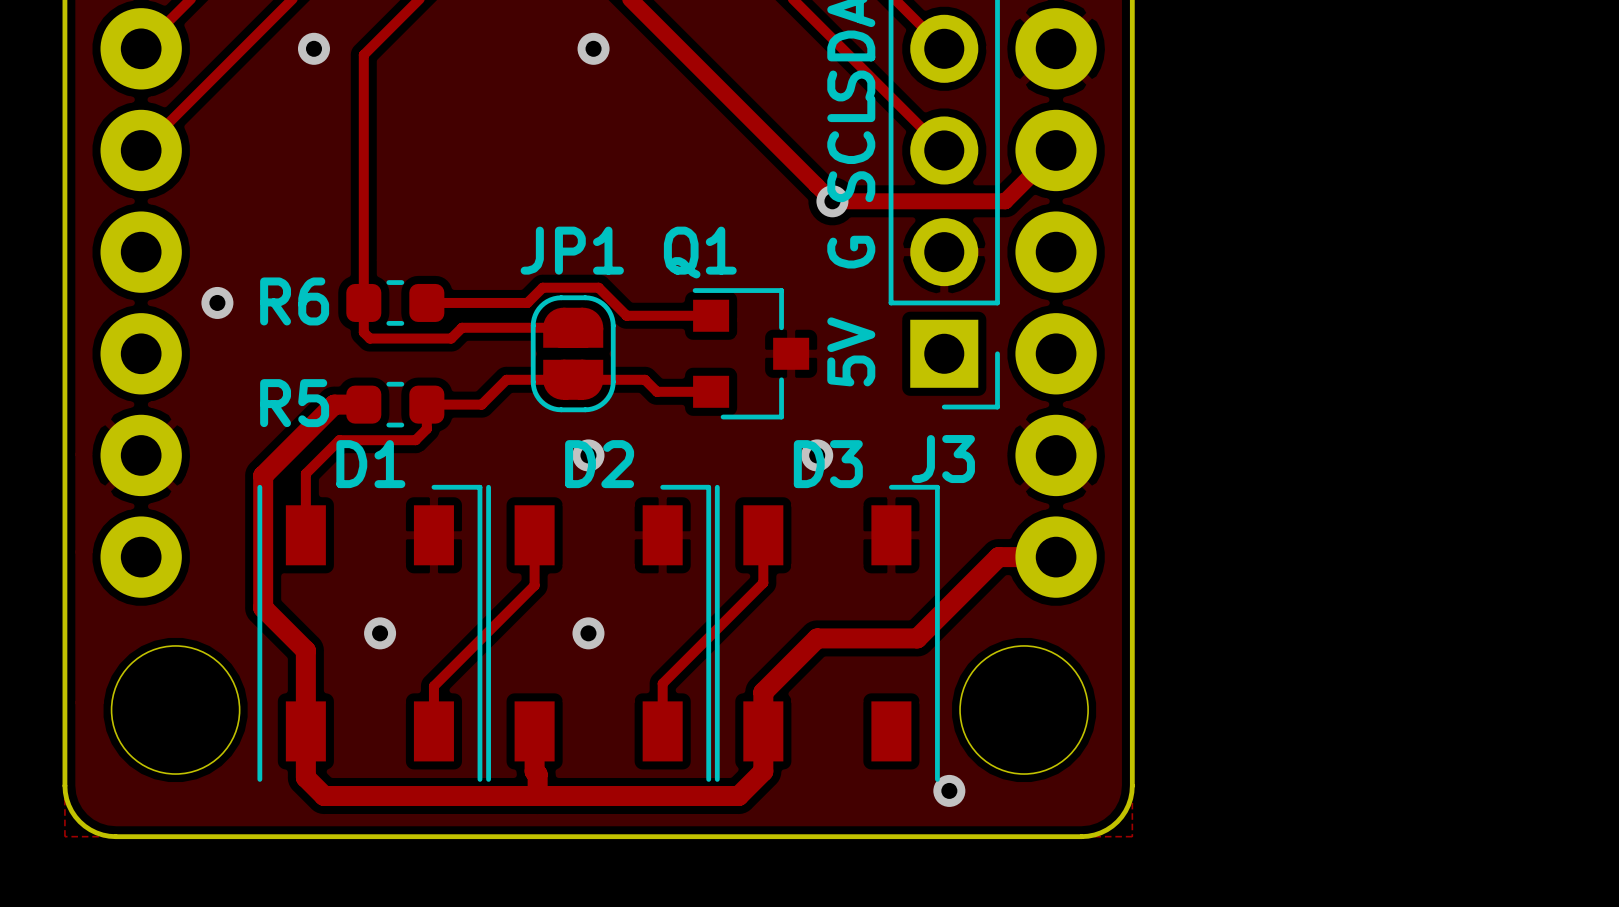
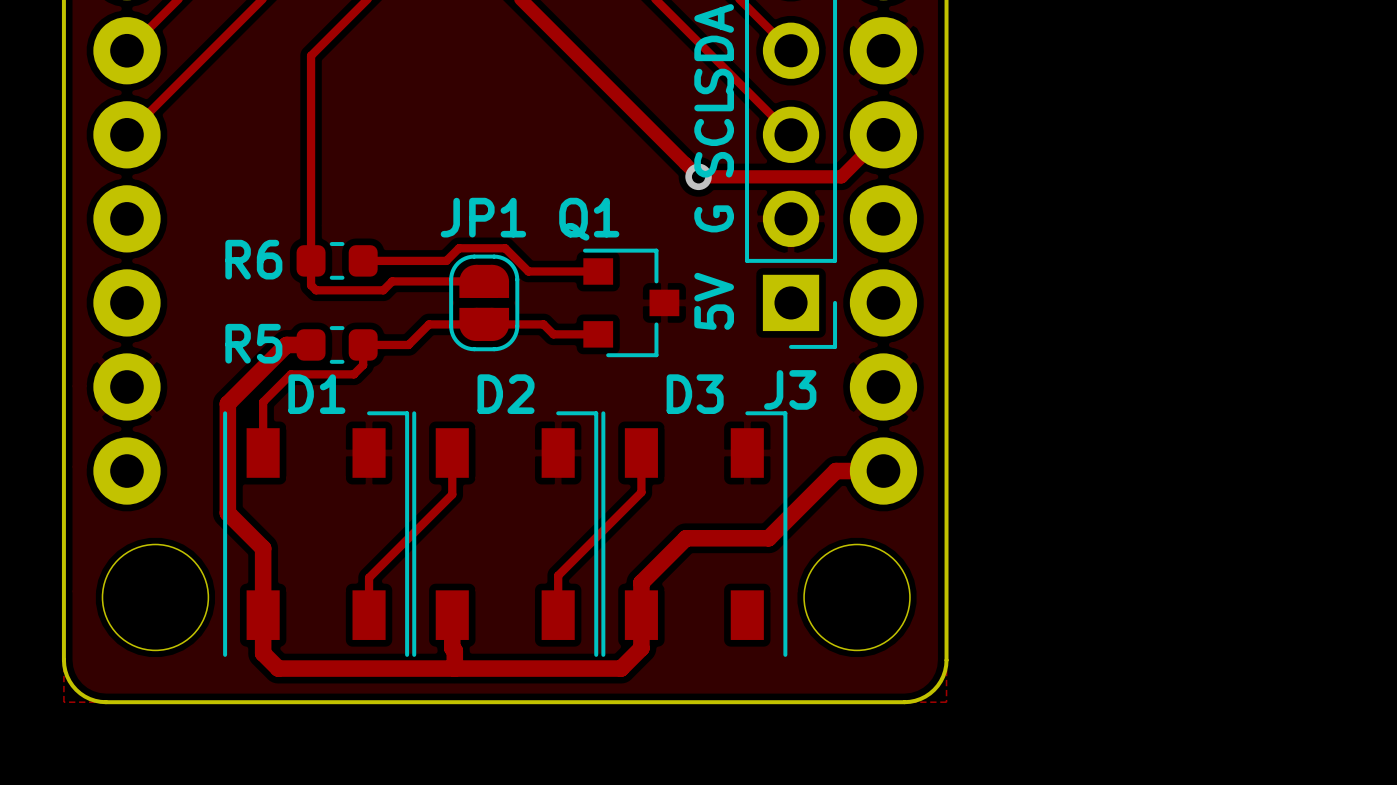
via: (313, 48) -> none
via: (593, 48) -> none
via: (217, 302) -> none
via: (588, 455) -> none
via: (817, 455) -> none
via: (380, 633) -> none
via: (588, 633) -> none
via: (949, 790) -> none

